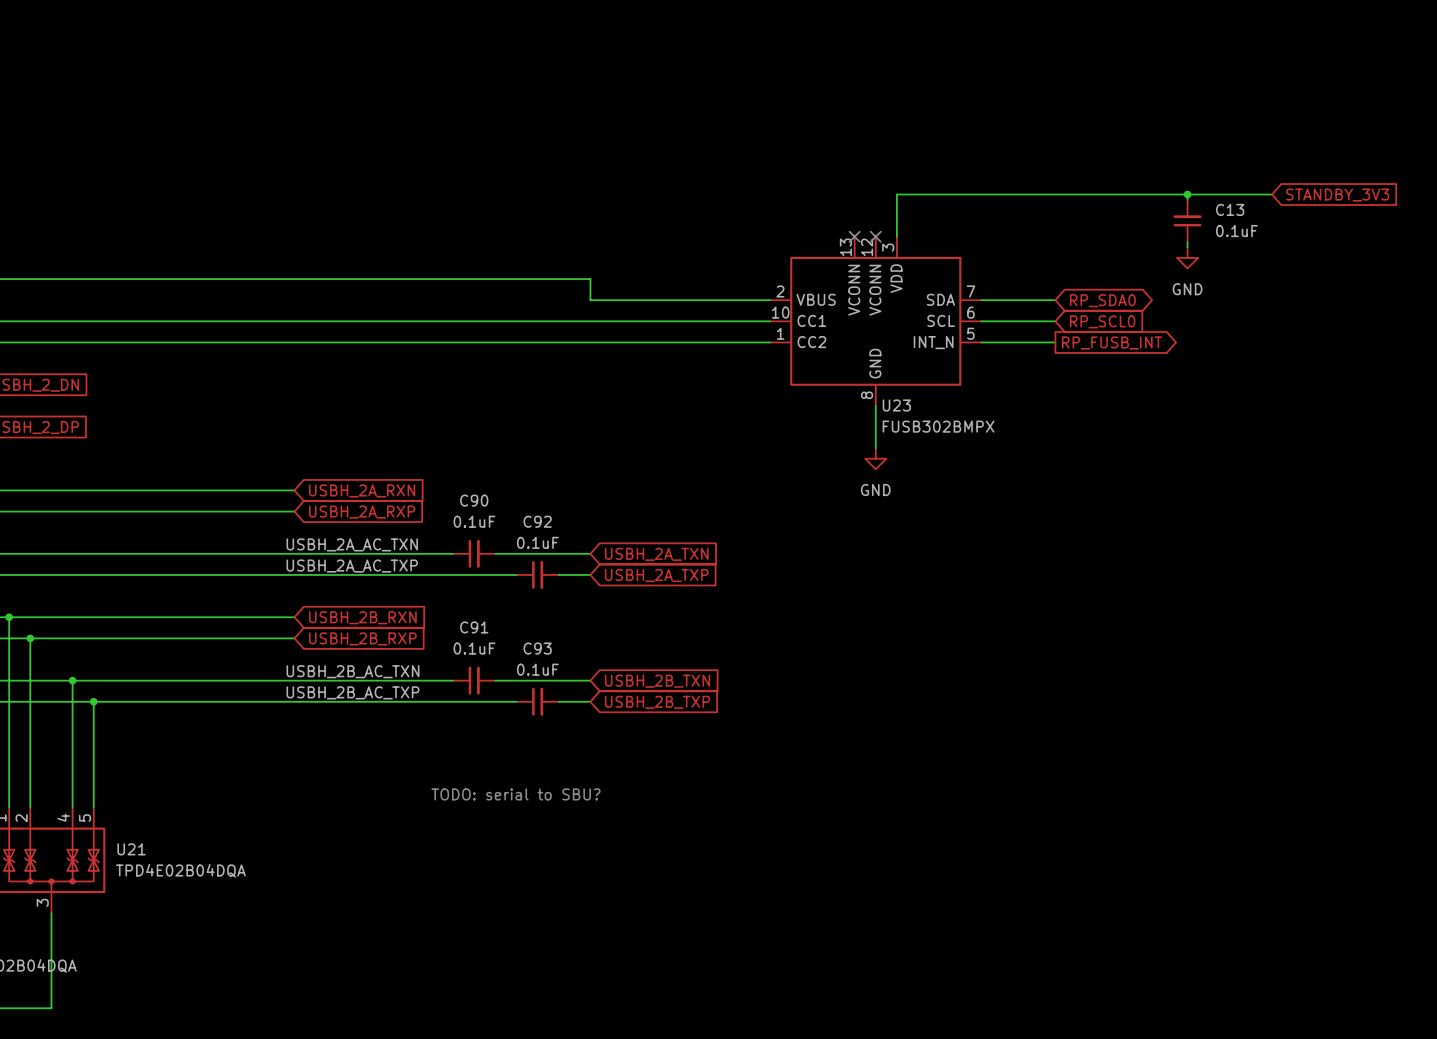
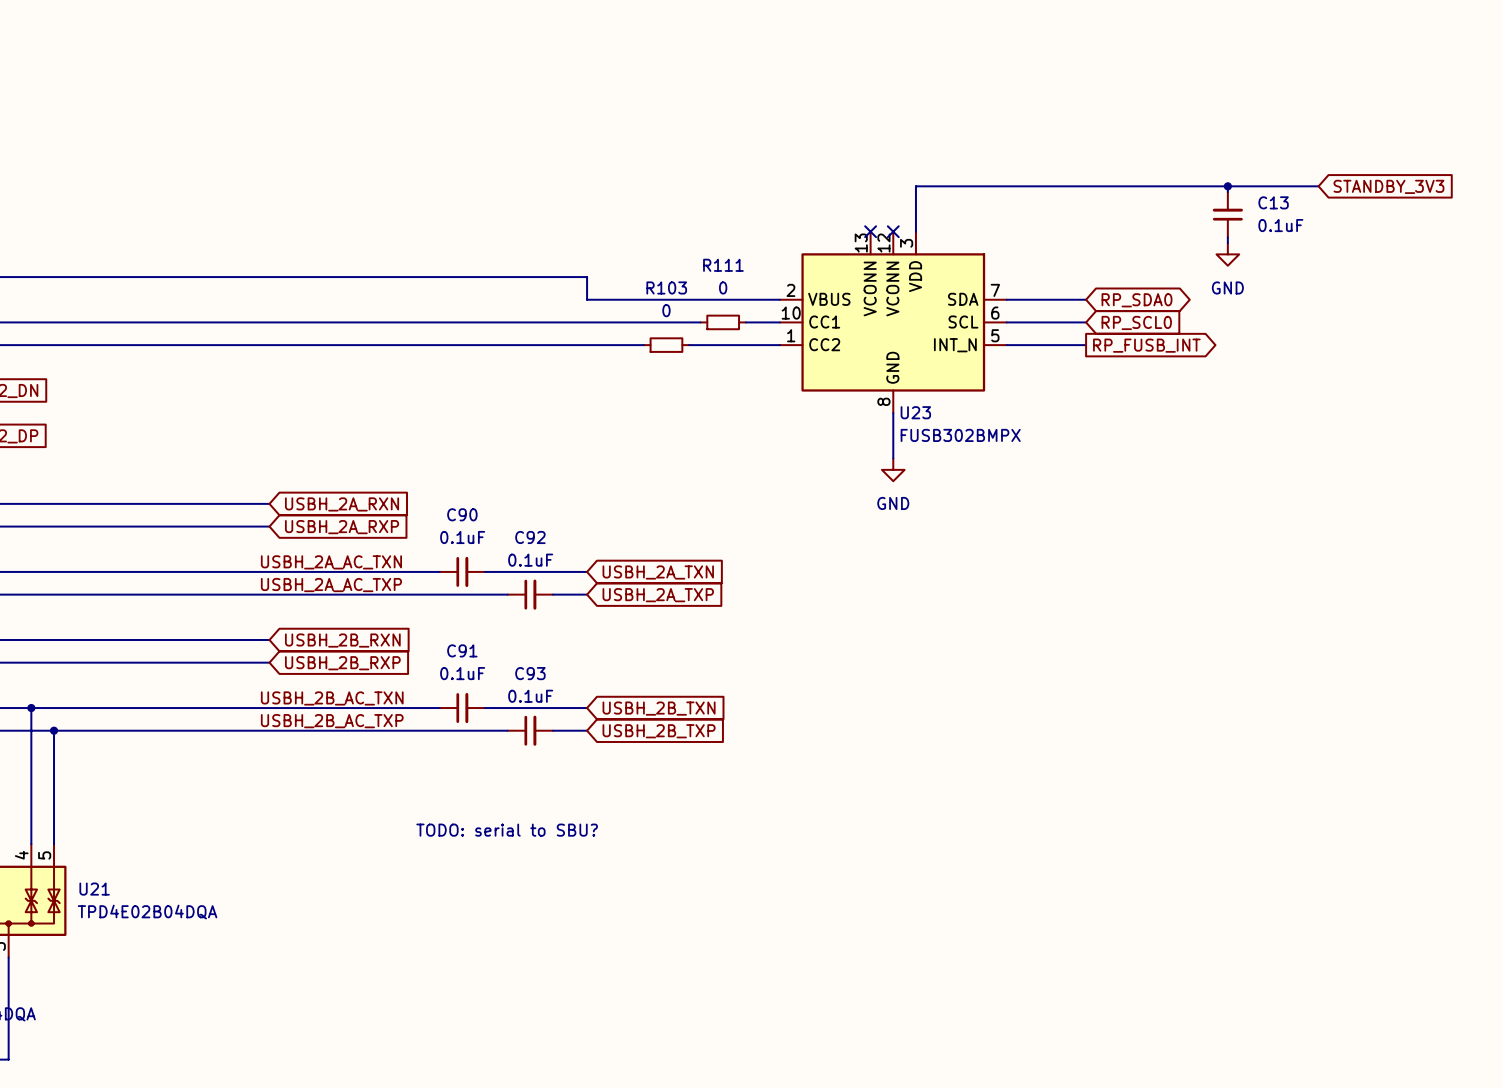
wire: (696, 321) (738, 321) -> none
R111: none -> 0 (723, 322)
wire: (643, 342) (685, 342) -> none
R103: none -> 0 (666, 345)

